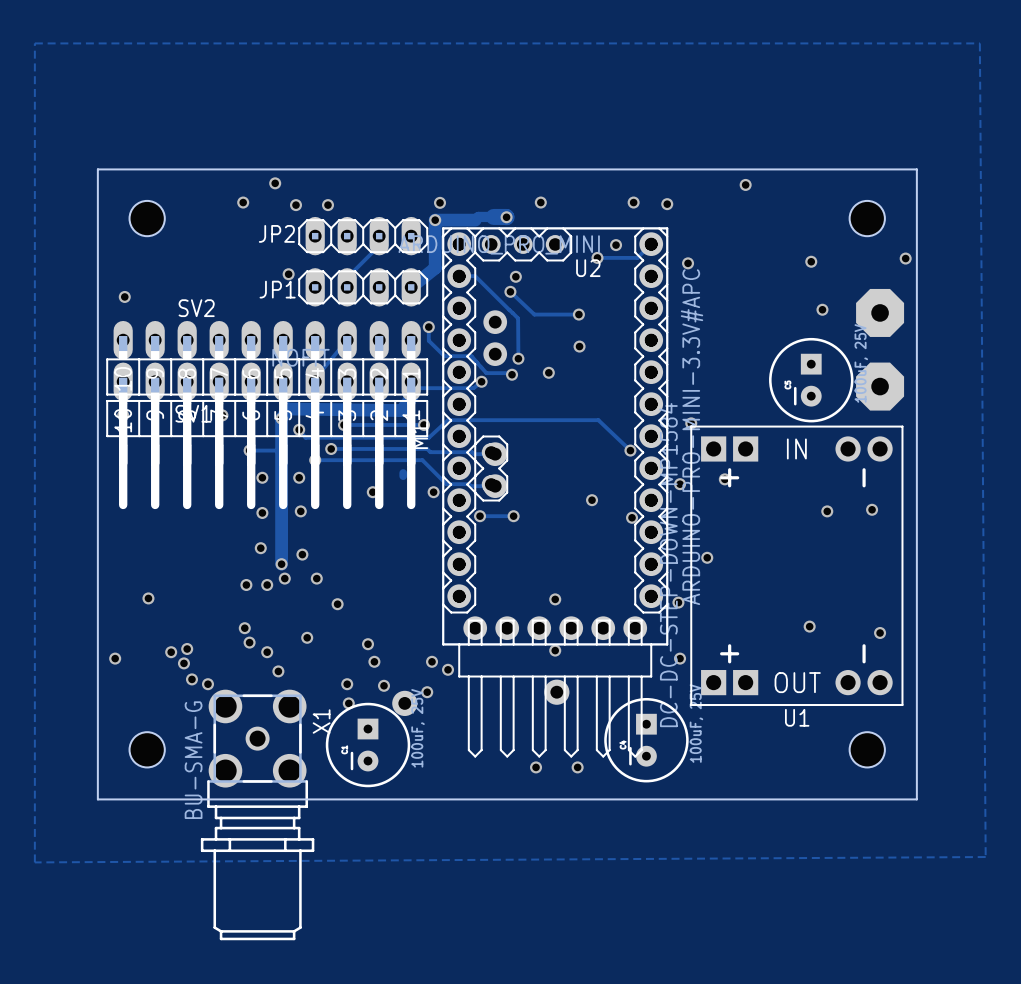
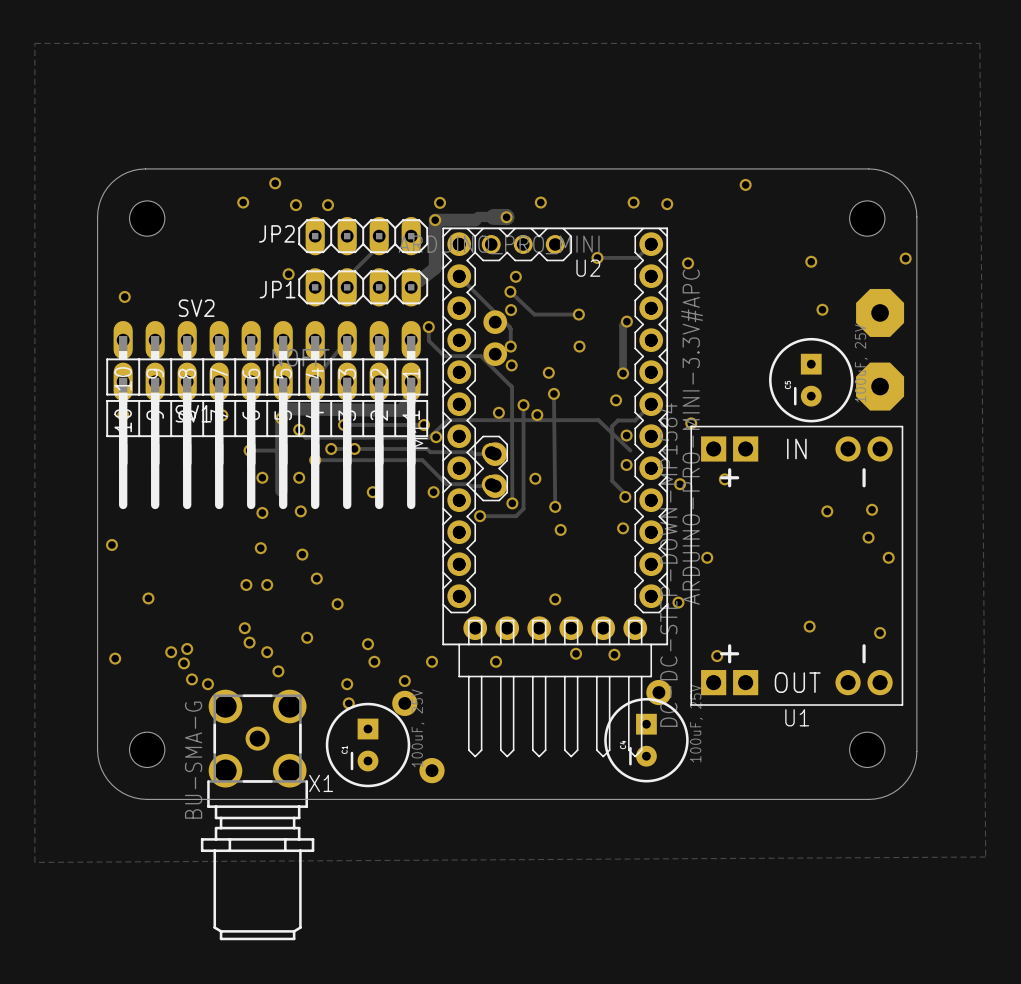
board edge: (916, 216) (916, 169) (97, 169) (97, 799) (147, 799) -> (916, 216) (913, 198) (902, 183) (887, 172) (868, 168) (145, 168) (133, 170) (116, 178) (104, 192) (99, 204) (97, 216) (97, 749) (101, 768) (112, 784) (128, 795) (147, 799)
via: (616, 245) -> none
track: (459, 276) (475, 276) (518, 318) (518, 358) -> (459, 276) (509, 327) (510, 346)
via: none -> (511, 310)
via: none -> (626, 321)
track: none -> (624, 324) (623, 373)
via: none -> (510, 346)
track: (471, 356) (486, 373) (511, 373) (512, 374) -> (471, 356) (480, 356) (512, 387)
via: (518, 358) -> none
via: none -> (511, 365)
via: none -> (623, 373)
via: (512, 374) -> none
track: (481, 381) (473, 388) (417, 388) -> none
via: (481, 381) -> none
track: none -> (512, 387) (512, 503)
track: none -> (553, 393) (555, 506)
via: none -> (553, 393)
via: none -> (616, 400)
track: none -> (651, 404) (635, 420) (617, 420) (612, 426) (612, 480) (625, 494) (625, 496)
track: none -> (523, 405) (523, 508) (516, 516) (513, 516)
via: none -> (523, 405)
via: none -> (498, 412)
via: none -> (537, 415)
via: none -> (626, 435)
via: none -> (436, 437)
via: none -> (354, 448)
via: (630, 450) -> none
via: none -> (626, 464)
track: (403, 472) (403, 476) -> none
via: none -> (535, 478)
track: (281, 490) (281, 564) -> none
via: none -> (625, 496)
via: (592, 500) -> none
via: none -> (555, 506)
via position: (513, 516) -> (512, 503)
via: (632, 517) -> none
via: none -> (623, 528)
via: none -> (560, 529)
via: none -> (868, 537)
via: none -> (111, 544)
via: none -> (888, 557)
via: (281, 564) -> none
via: (284, 578) -> none
via position: (555, 650) -> (576, 653)
via: none -> (614, 654)
via: none -> (717, 656)
via: (680, 658) -> none
via: none -> (496, 661)
via: (448, 669) -> none
via: none -> (404, 681)
via: (384, 685) -> none
via: (427, 692) -> none
part: (556, 692) -> none
part: none -> (658, 692)
X1 name rotation: 0° (321, 721) -> 90° clockwise (321, 783)
X1 name position: X1 (321, 721) -> X1 (321, 783)
board edge: (916, 751) (916, 799) (868, 799) -> (916, 751) (913, 769) (902, 785) (887, 795) (868, 799)
via: (536, 767) -> none
via: (577, 767) -> none
part: none -> (432, 770)

